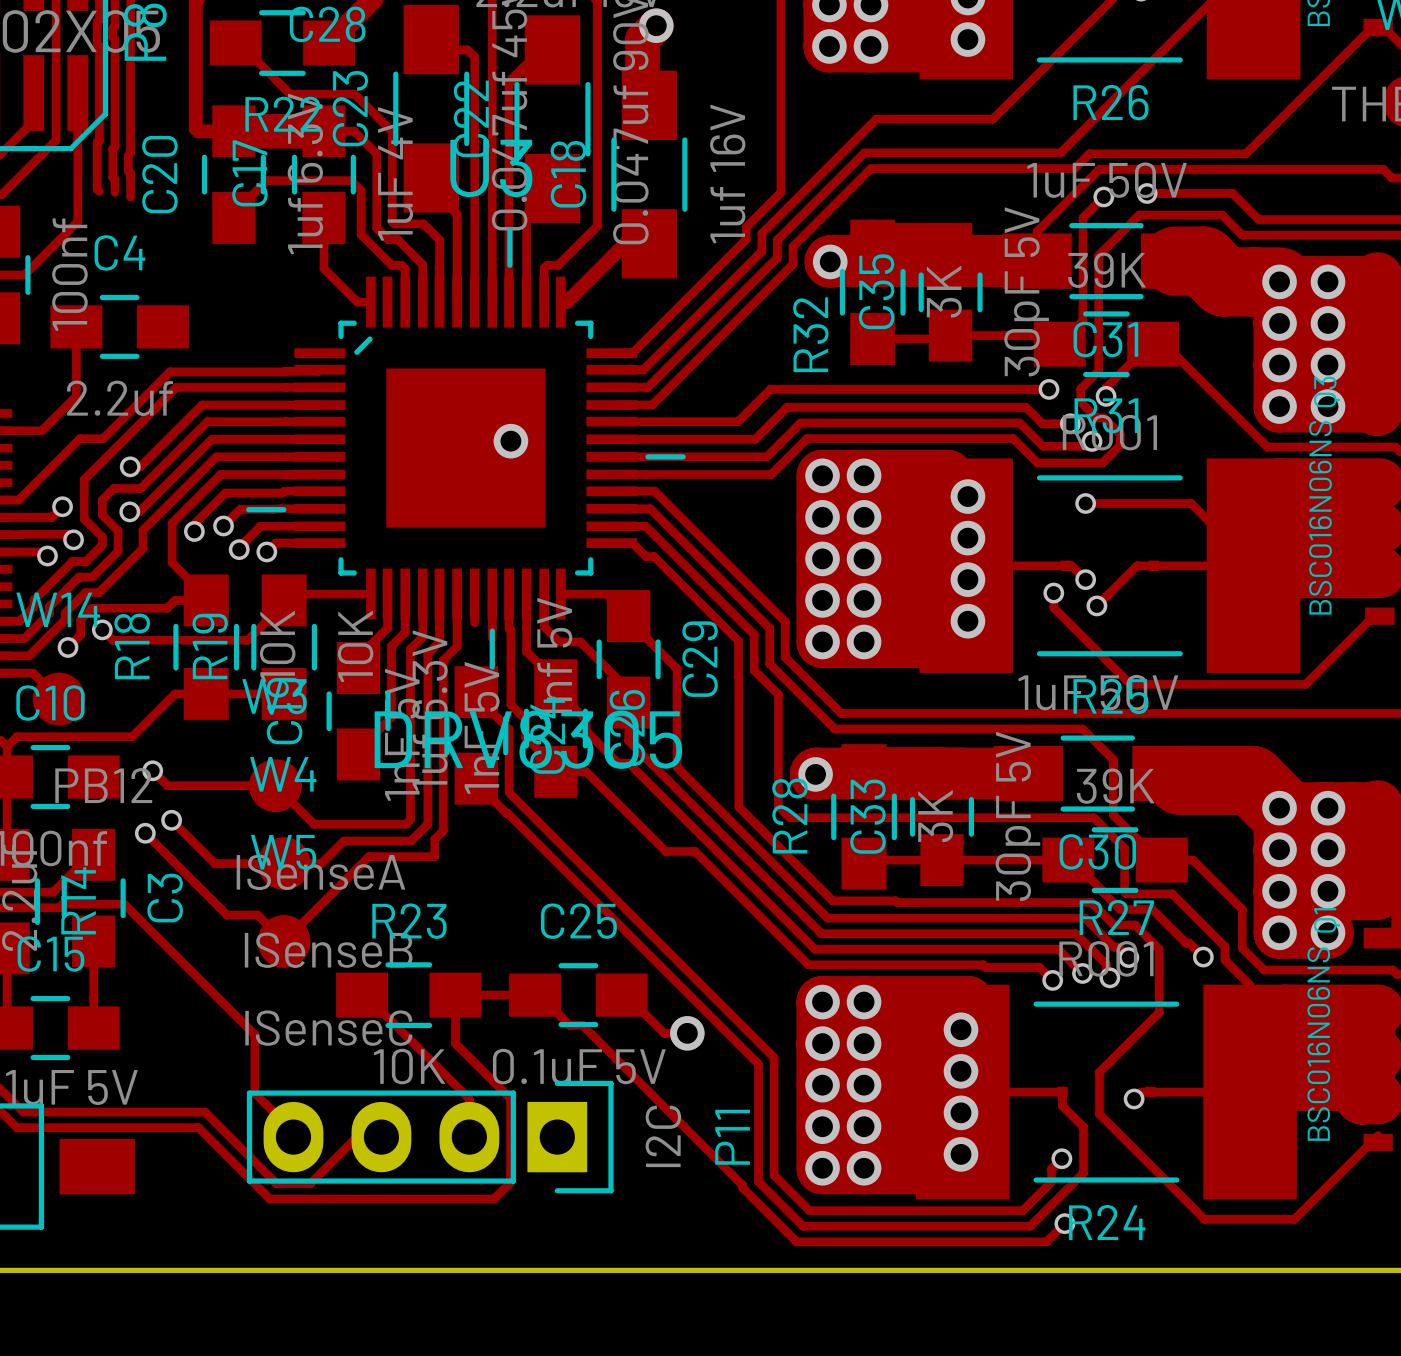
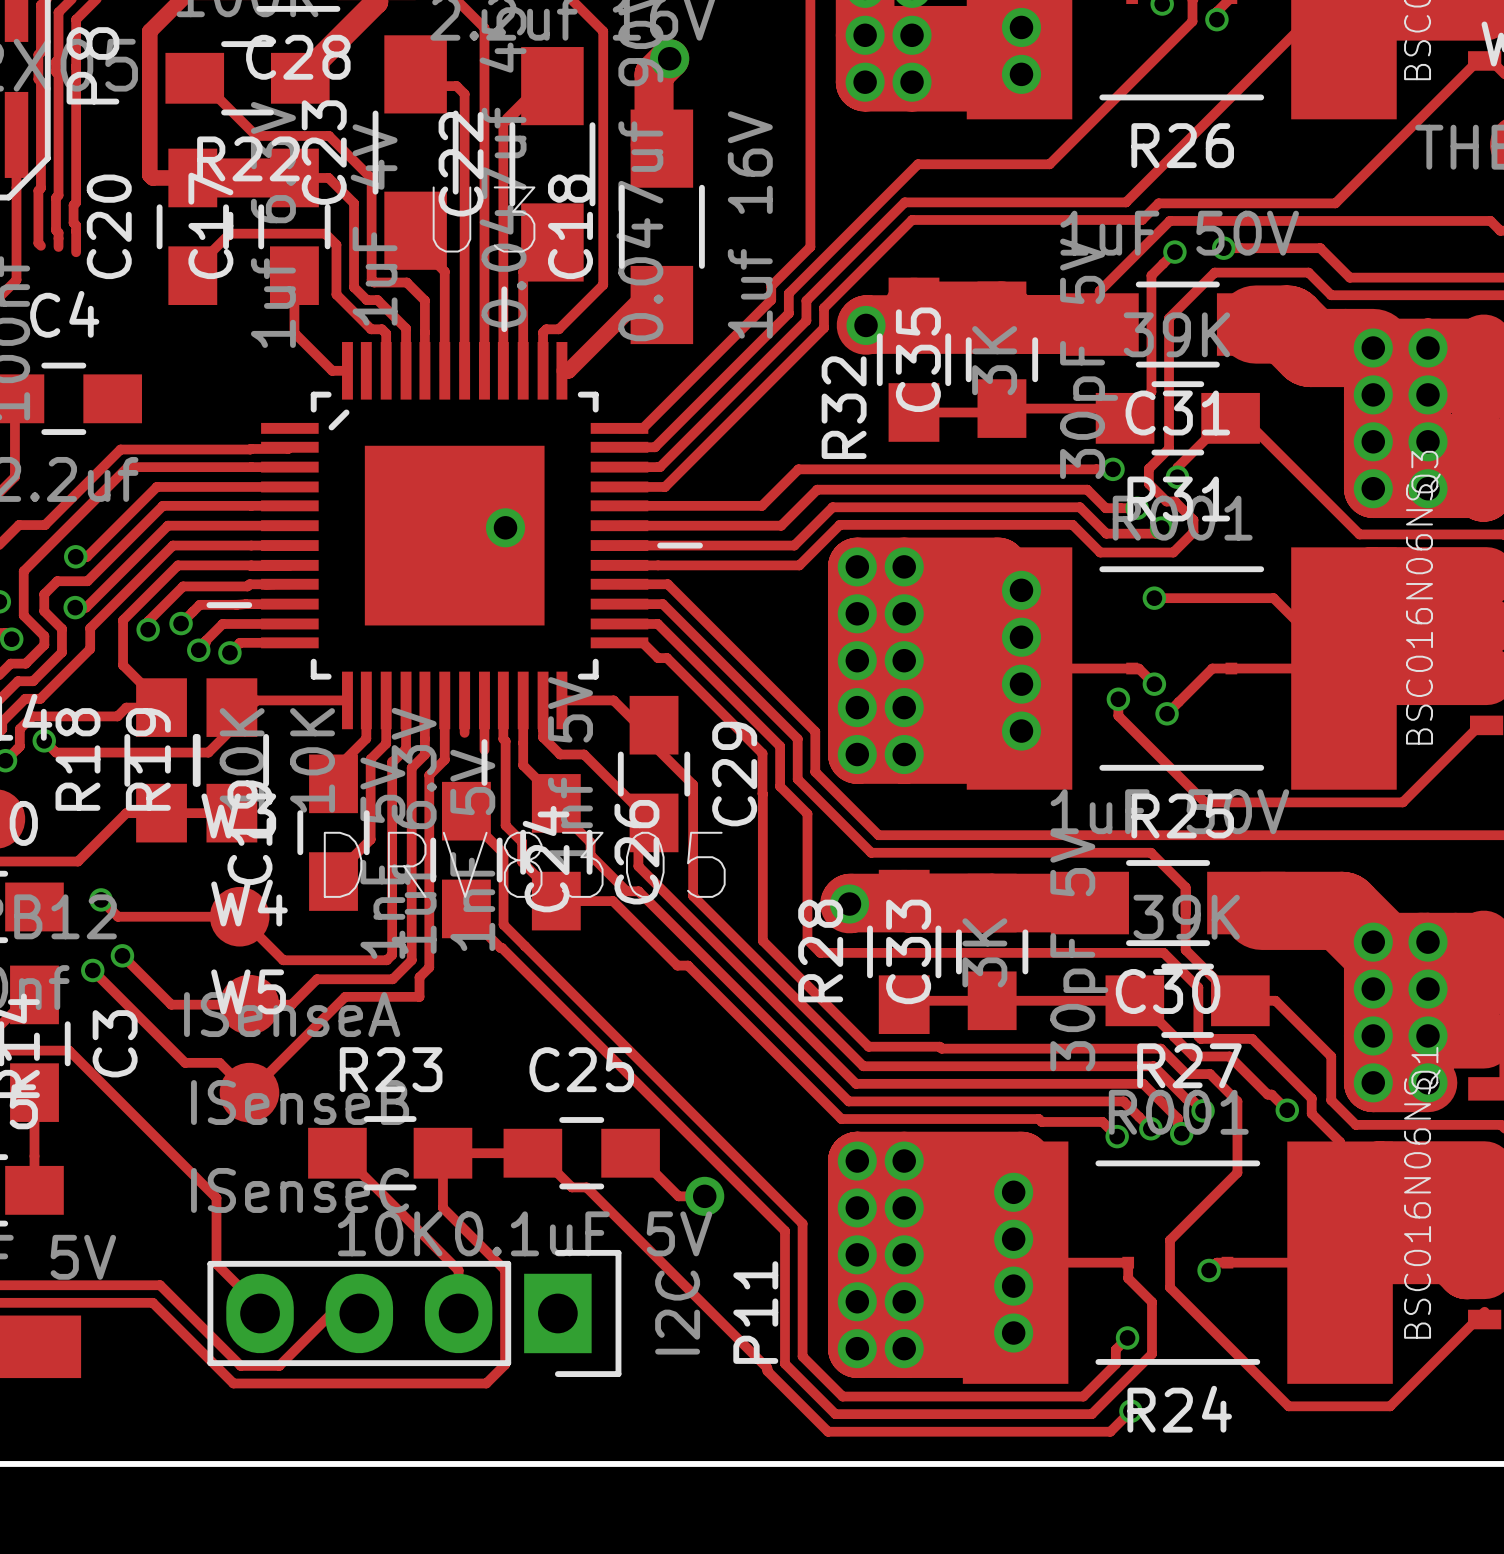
R19 position: (284, 647) -> (231, 760)
C29 position: (628, 659) -> (654, 774)
track: (586, 771) (665, 851) (695, 851) -> (590, 901) (613, 901) (677, 965) (688, 965) (713, 991)

